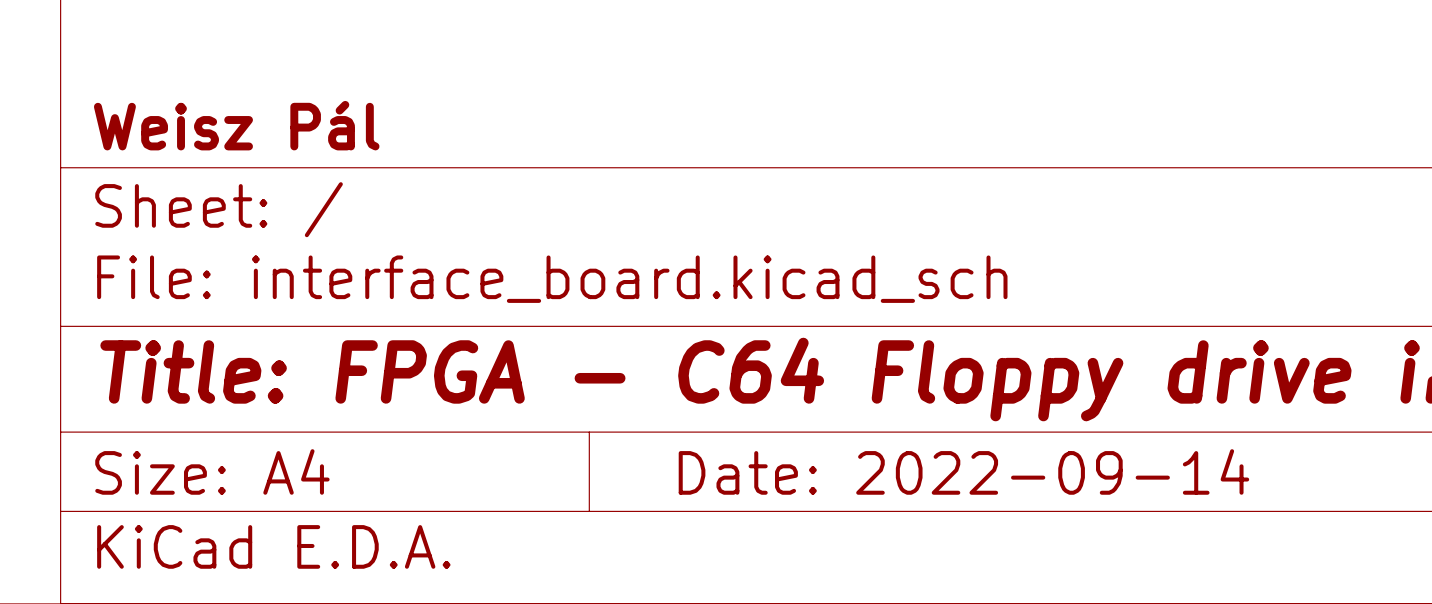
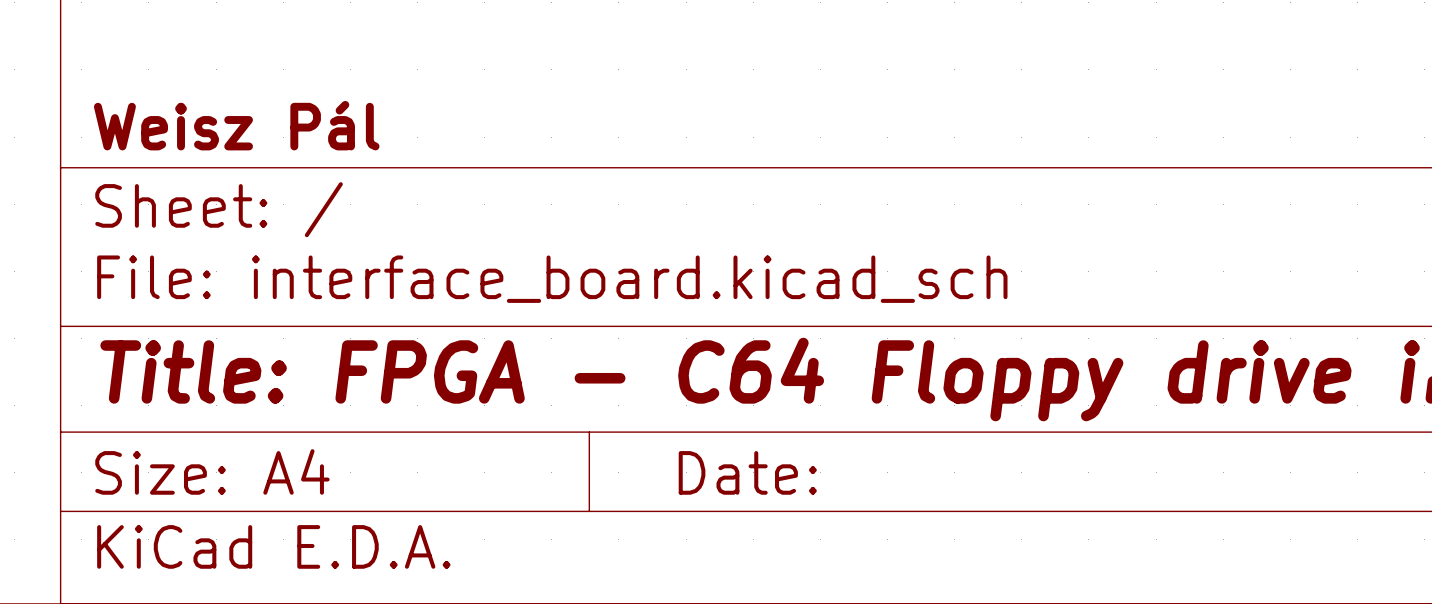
title block: Date: 2022-09-14 (963, 471) -> Date: (747, 472)

